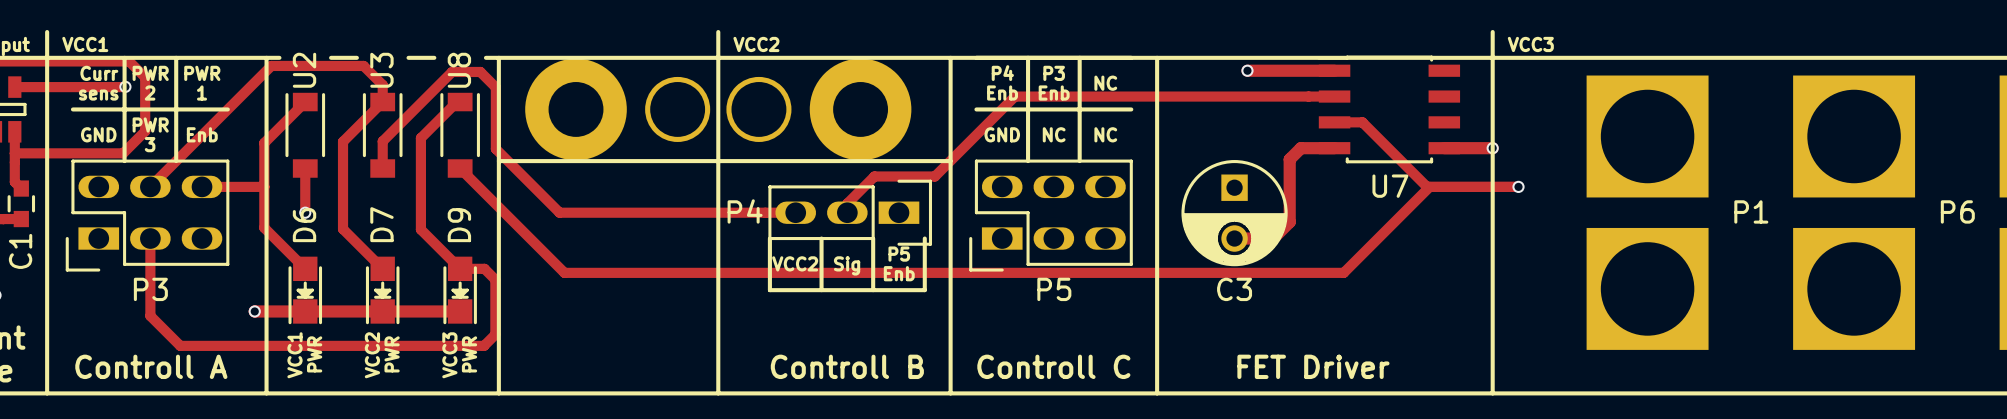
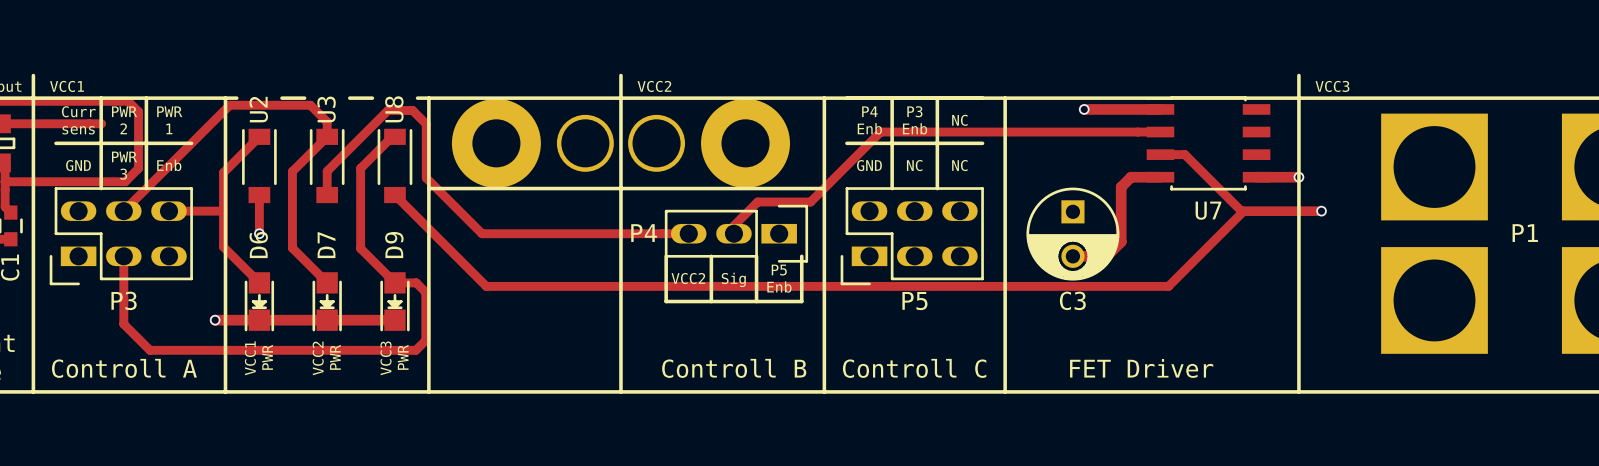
track: (129, 61) (145, 77) (145, 131) (123, 153) -> (105, 101) (128, 101) (138, 111) (138, 168) (125, 181) (99, 181)
via: (125, 86) -> none

